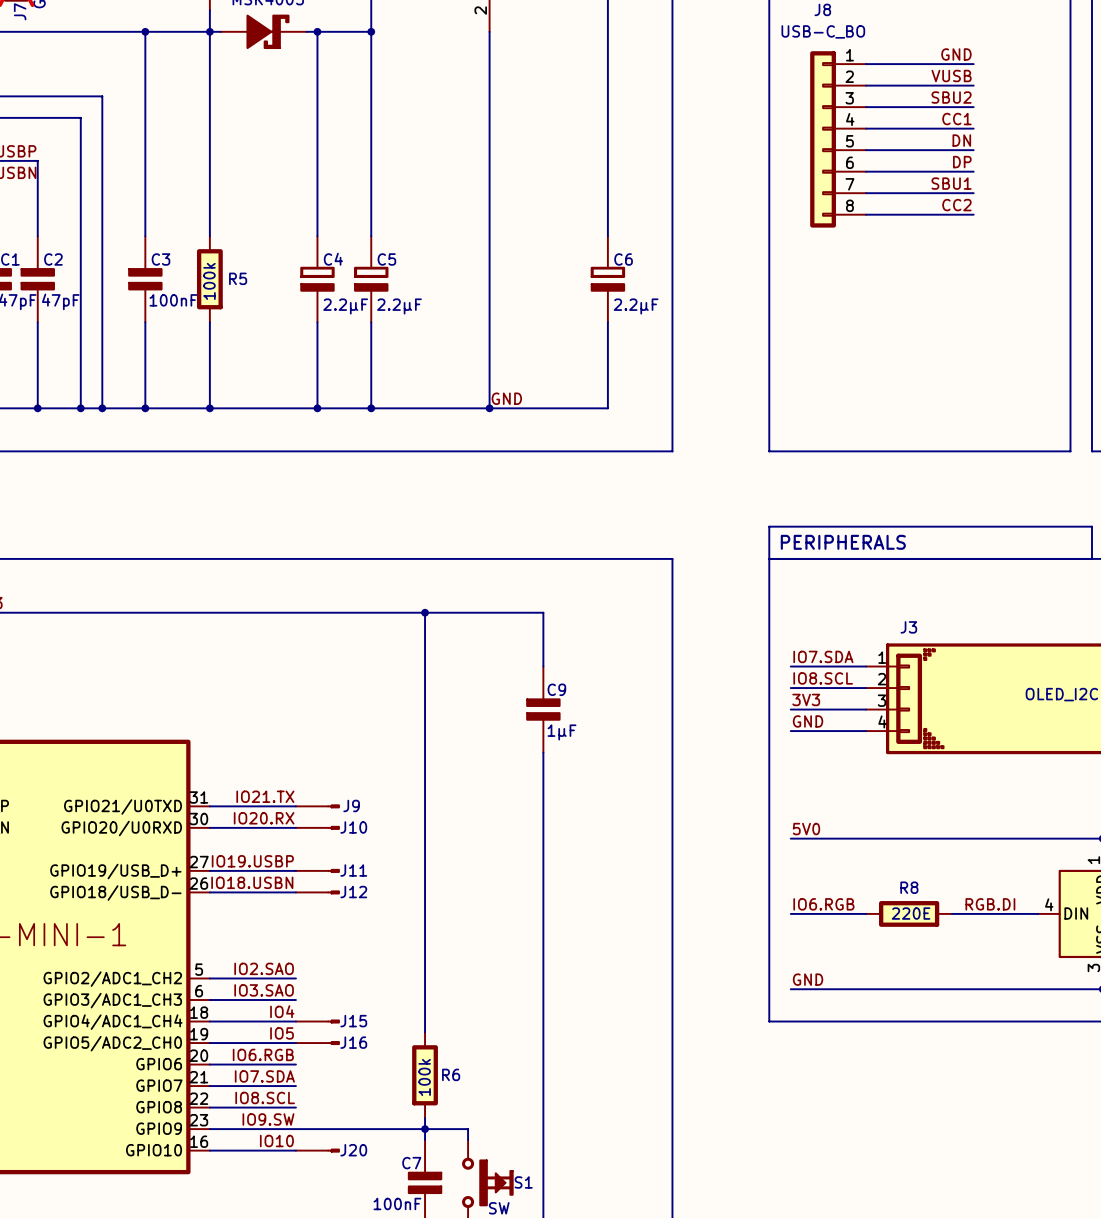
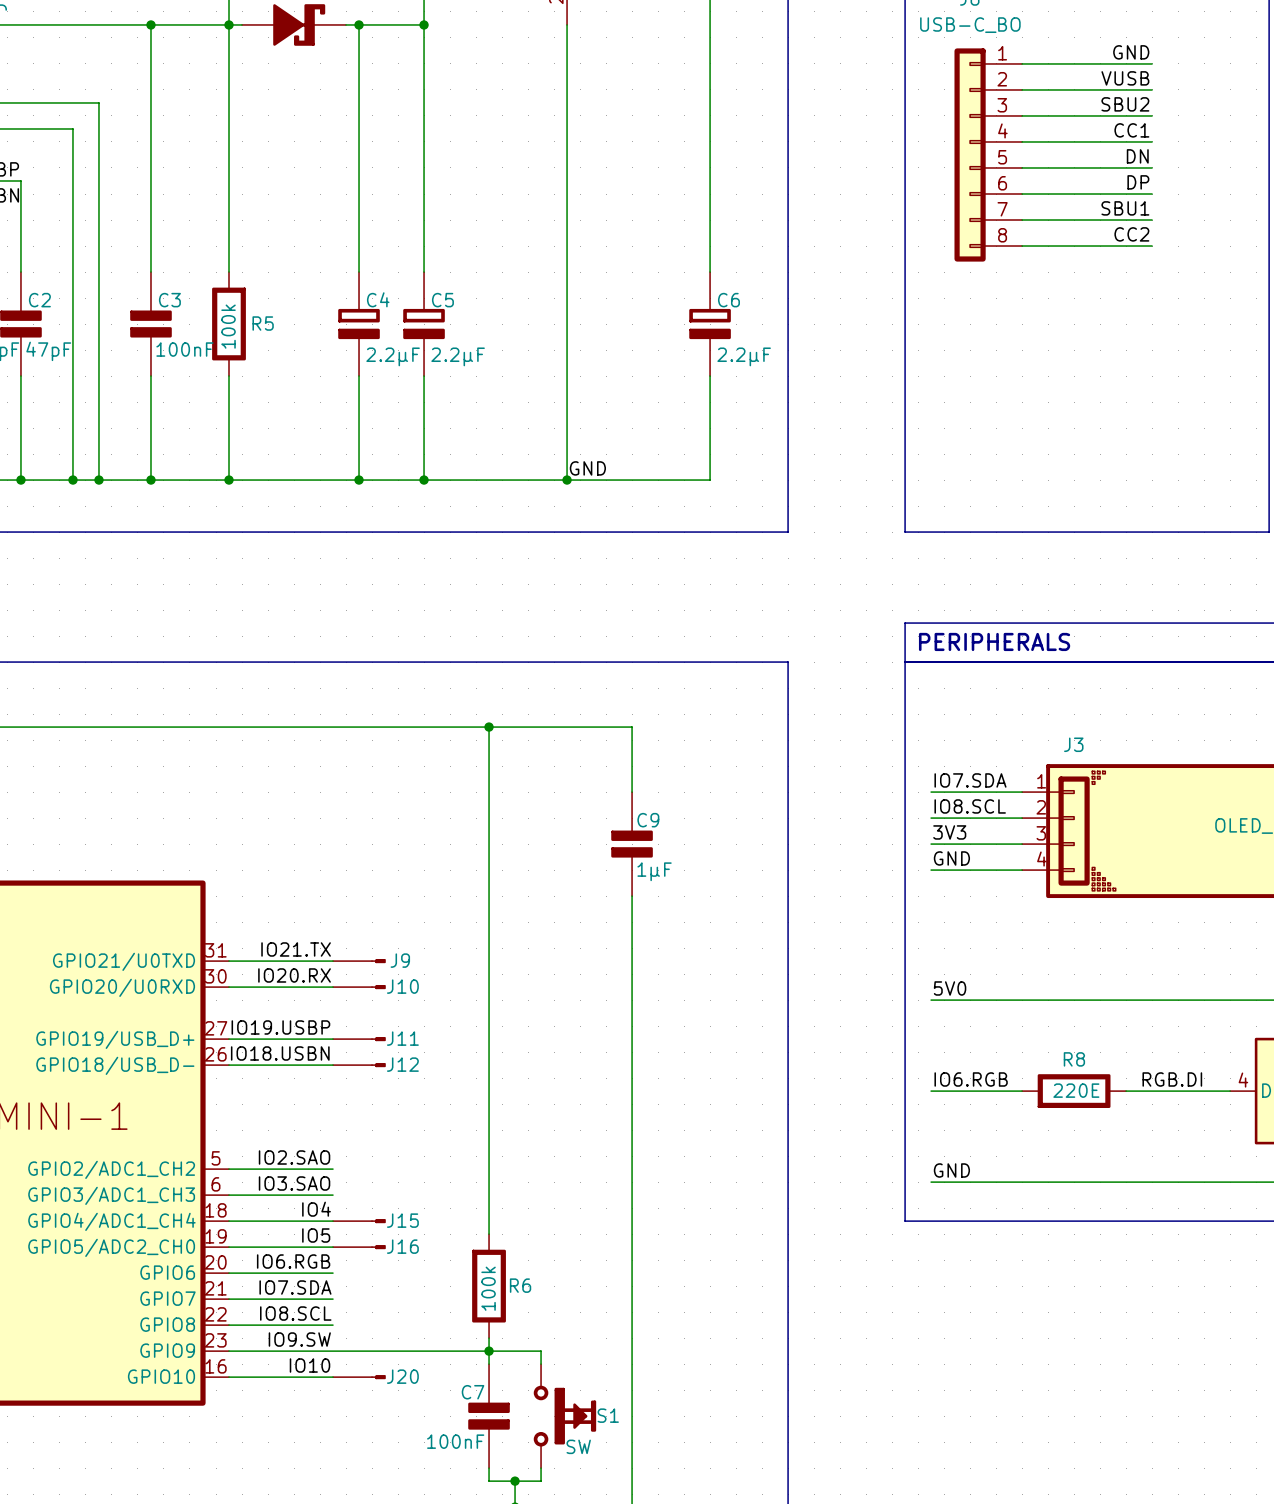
R5 symbol: [196, 236, 223, 323] -> [212, 272, 246, 377]
C4 symbol: [300, 236, 335, 323] -> [338, 272, 380, 377]
C5 symbol: [354, 236, 389, 323] -> [403, 272, 445, 377]
C6 symbol: [590, 236, 626, 323] -> [689, 272, 731, 377]
R8 symbol: [866, 901, 953, 927] -> [1022, 1074, 1127, 1109]
R6 symbol: [412, 1032, 438, 1119] -> [472, 1234, 506, 1339]

